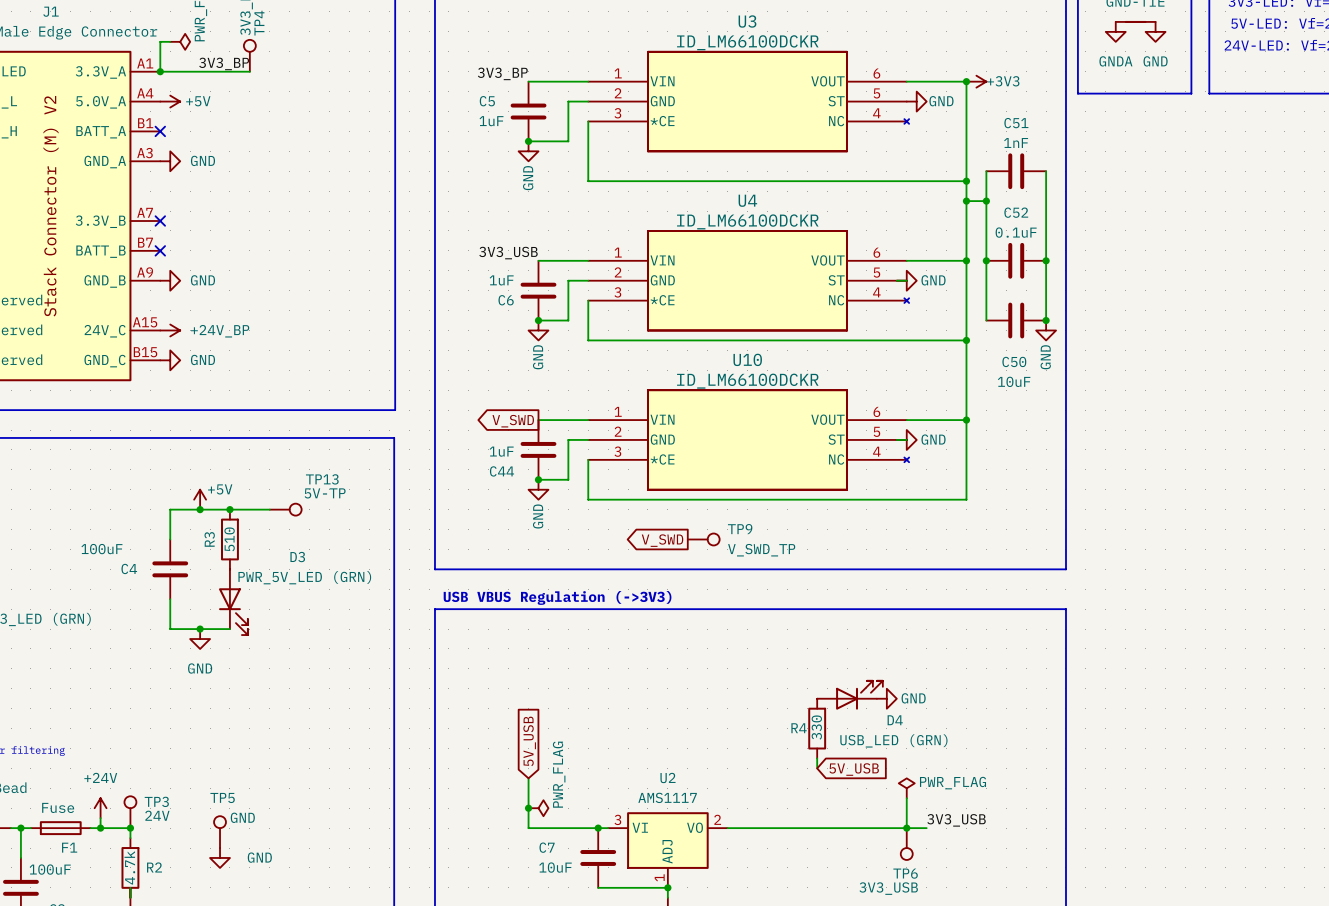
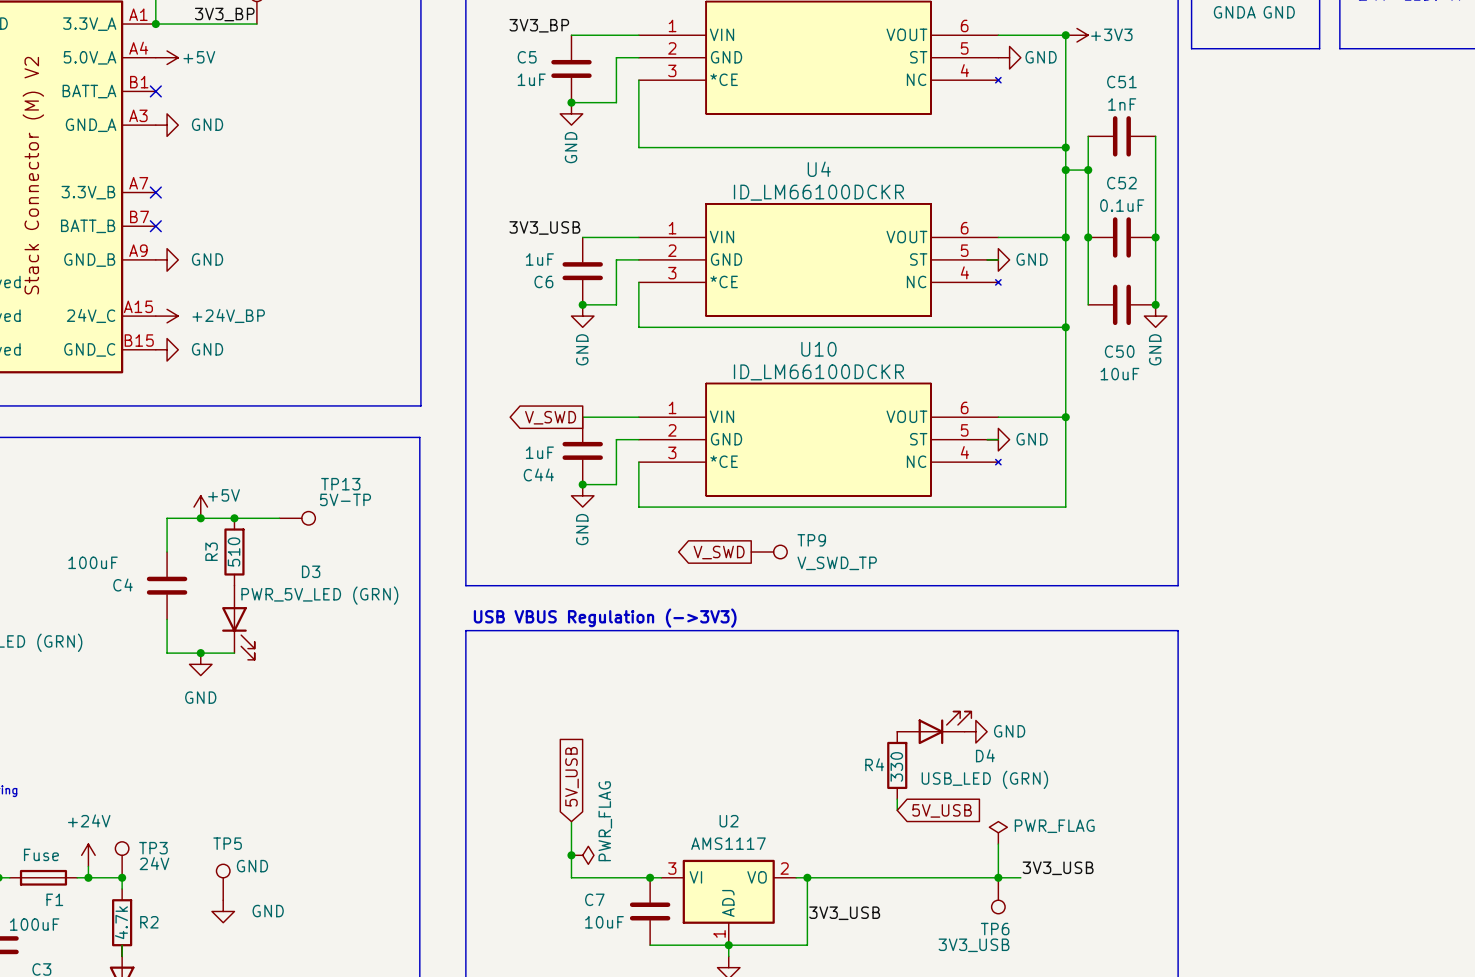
wire: none -> (807, 877) (807, 945) (728, 945)
junction: none -> (807, 877)
label: none -> 3V3_USB (844, 913)

